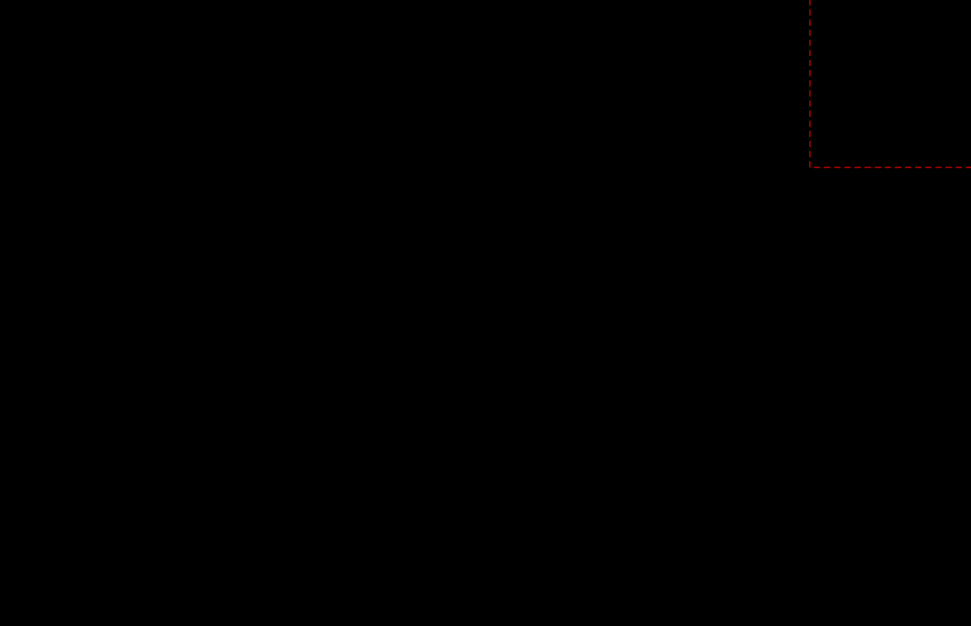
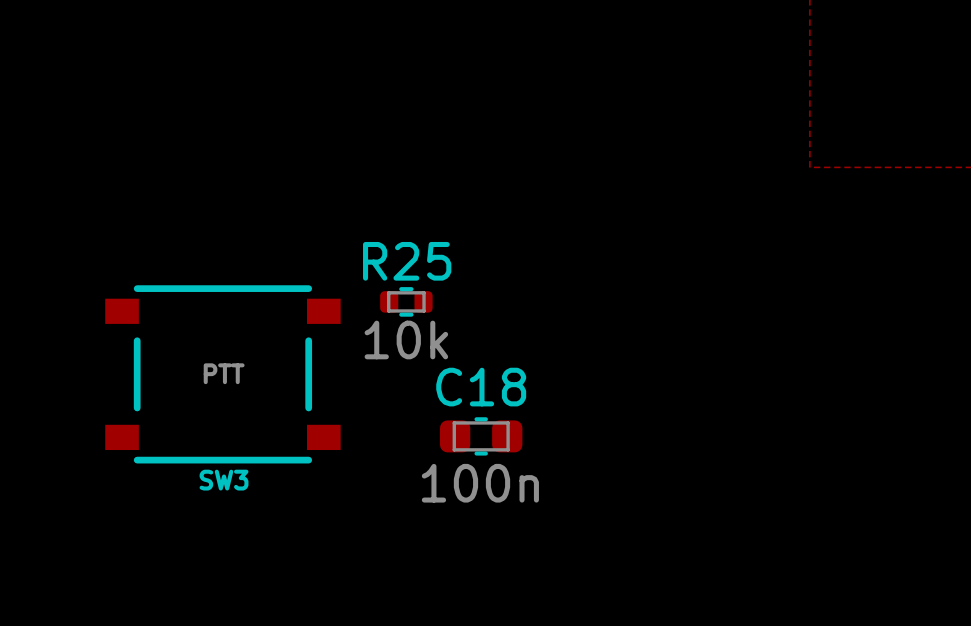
R25: none -> 10k (406, 301)
SW3: none -> PTT (222, 374)
C18: none -> 100n (481, 436)

